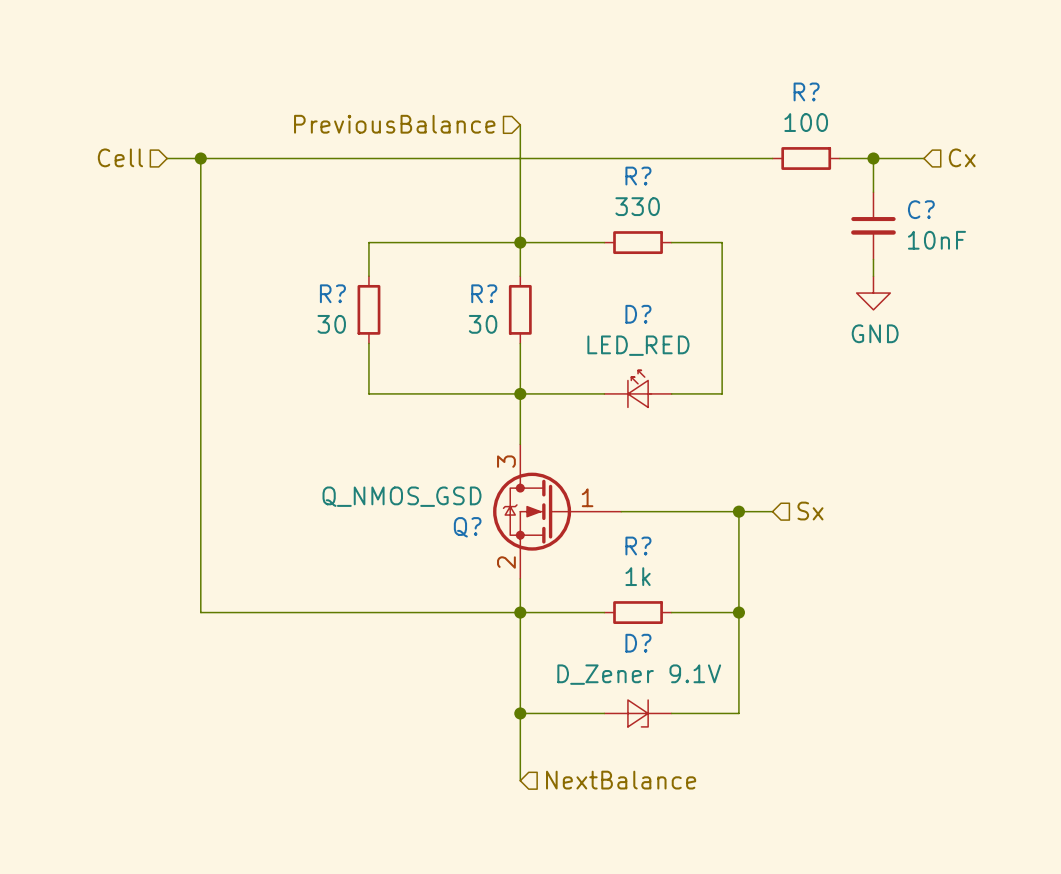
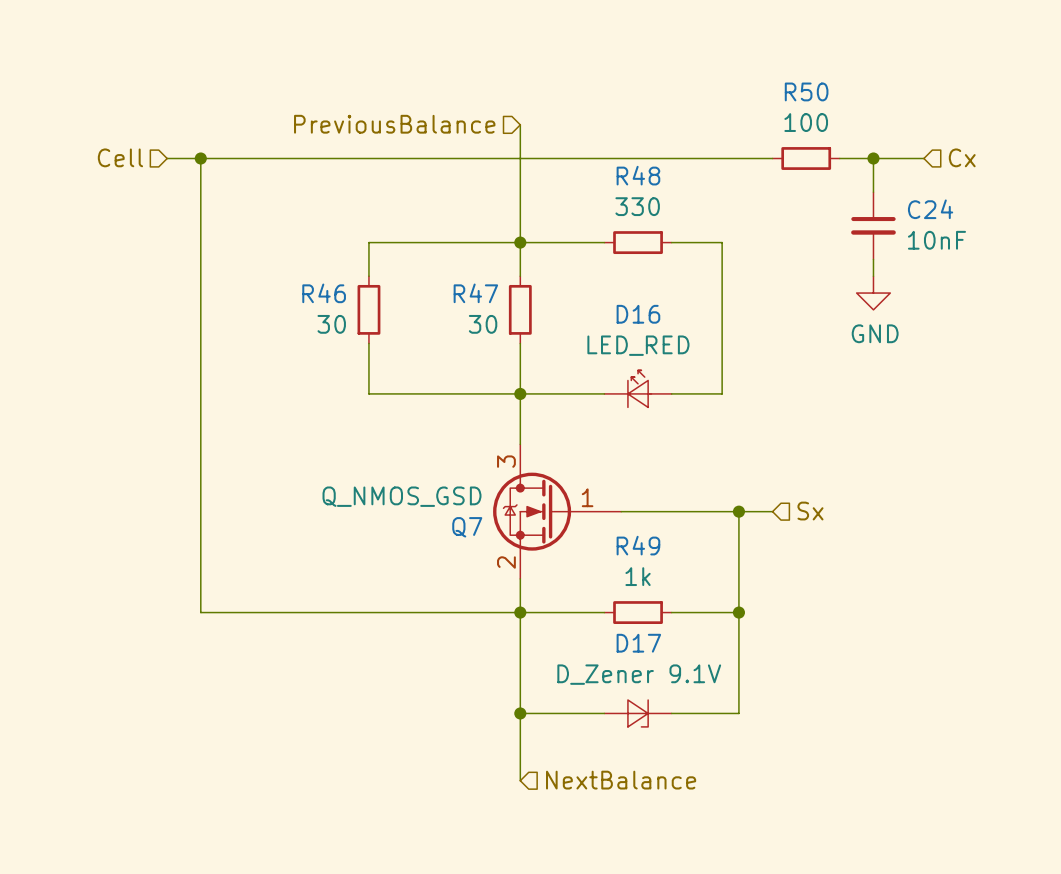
R? name: R? (806, 91) -> R50 (806, 91)
R? name: R? (638, 176) -> R48 (638, 175)
C? name: C? (921, 209) -> C24 (930, 209)
R? name: R? (332, 293) -> R46 (324, 293)
R? name: R? (484, 293) -> R47 (475, 293)
D? name: D? (638, 314) -> D16 (638, 314)
Q? name: Q? (467, 527) -> Q7 (467, 527)
R? name: R? (638, 546) -> R49 (638, 545)
D? name: D? (638, 643) -> D17 (638, 643)

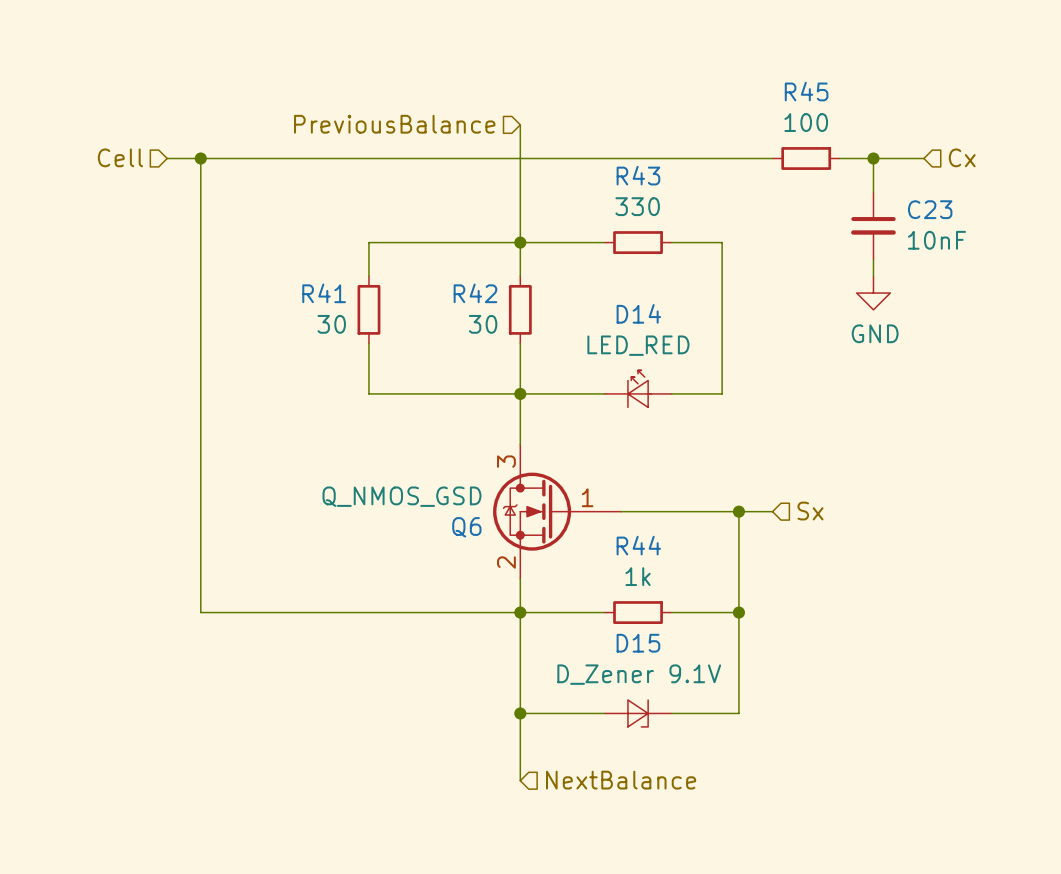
R50 name: R50 (806, 91) -> R45 (806, 91)
R48 name: R48 (638, 175) -> R43 (638, 175)
C24 name: C24 (930, 209) -> C23 (930, 209)
R46 name: R46 (324, 293) -> R41 (324, 293)
R47 name: R47 (475, 293) -> R42 (475, 293)
D16 name: D16 (638, 314) -> D14 (638, 313)
Q7 name: Q7 (467, 527) -> Q6 (466, 527)
R49 name: R49 (638, 545) -> R44 (638, 545)
D17 name: D17 (638, 643) -> D15 (638, 643)

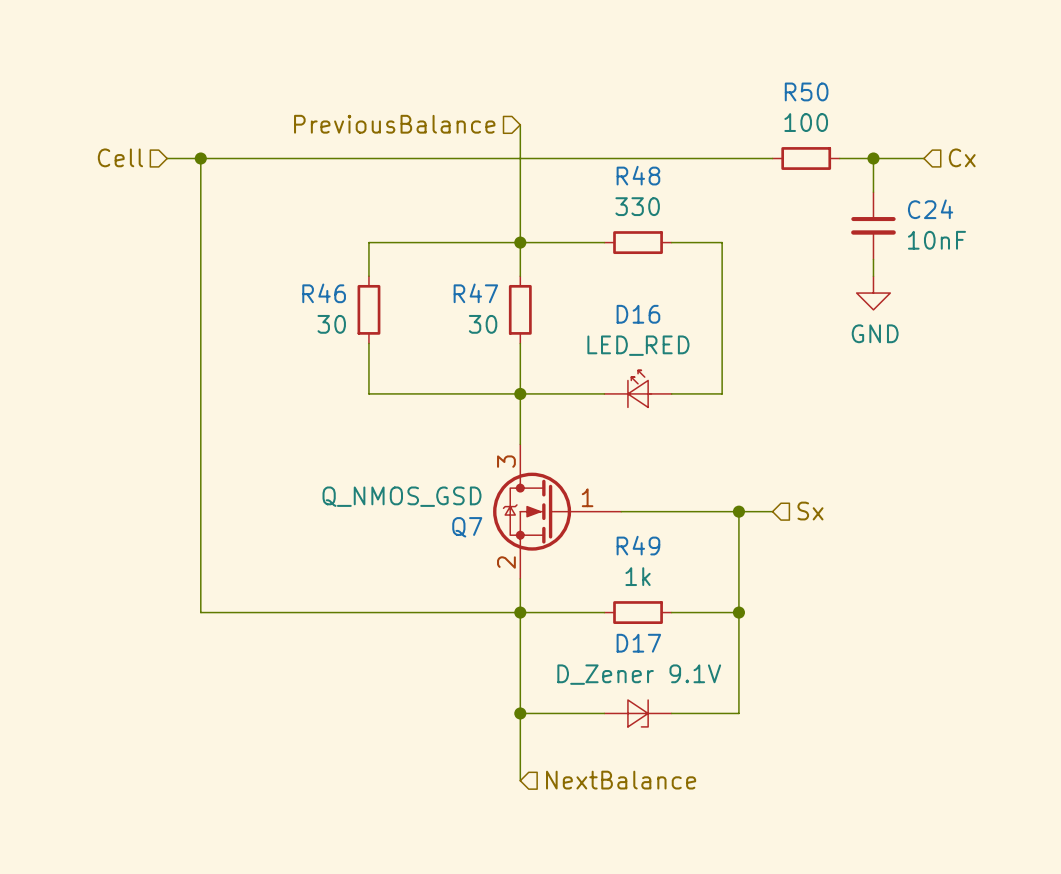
R45 name: R45 (806, 91) -> R50 (806, 91)
R43 name: R43 (638, 175) -> R48 (638, 175)
C23 name: C23 (930, 209) -> C24 (930, 209)
R41 name: R41 (324, 293) -> R46 (324, 293)
R42 name: R42 (475, 293) -> R47 (475, 293)
D14 name: D14 (638, 313) -> D16 (638, 314)
Q6 name: Q6 (466, 527) -> Q7 (467, 527)
R44 name: R44 (638, 545) -> R49 (638, 545)
D15 name: D15 (638, 643) -> D17 (638, 643)

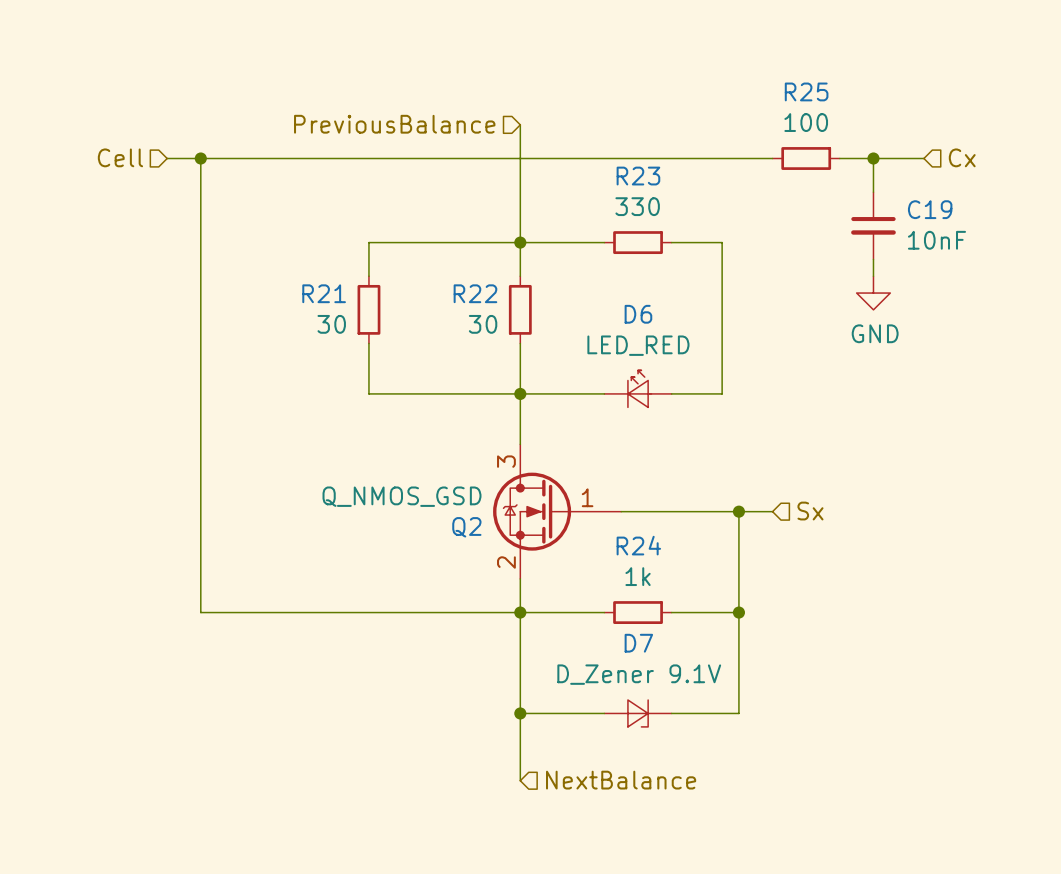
R50 name: R50 (806, 91) -> R25 (806, 91)
R48 name: R48 (638, 175) -> R23 (638, 176)
C24 name: C24 (930, 209) -> C19 (930, 209)
R46 name: R46 (324, 293) -> R21 (324, 293)
R47 name: R47 (475, 293) -> R22 (475, 293)
D16 name: D16 (638, 314) -> D6 (638, 314)
Q7 name: Q7 (467, 527) -> Q2 (466, 527)
R49 name: R49 (638, 545) -> R24 (638, 545)
D17 name: D17 (638, 643) -> D7 (638, 643)

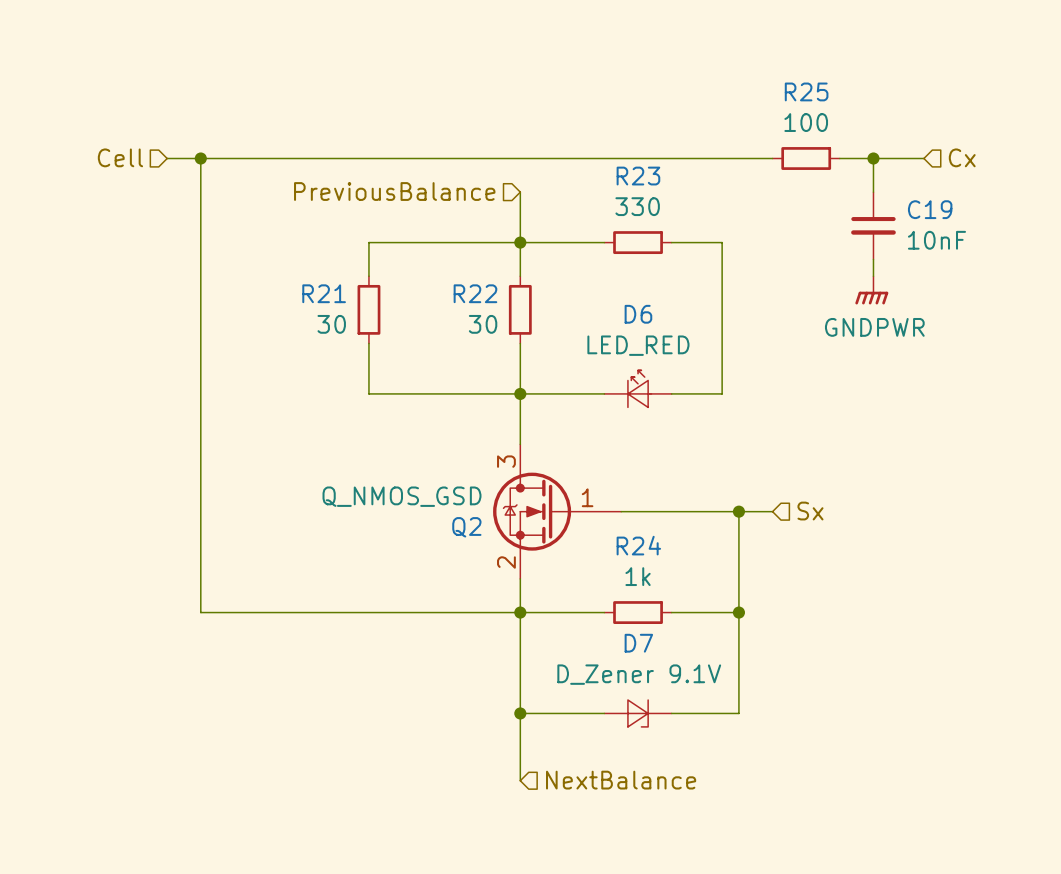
hierarchical label position: PreviousBalance (394, 124) -> PreviousBalance (394, 191)
wire: (520, 124) (520, 192) -> none
power symbol: GND (873, 293) -> GNDPWR (871, 290)

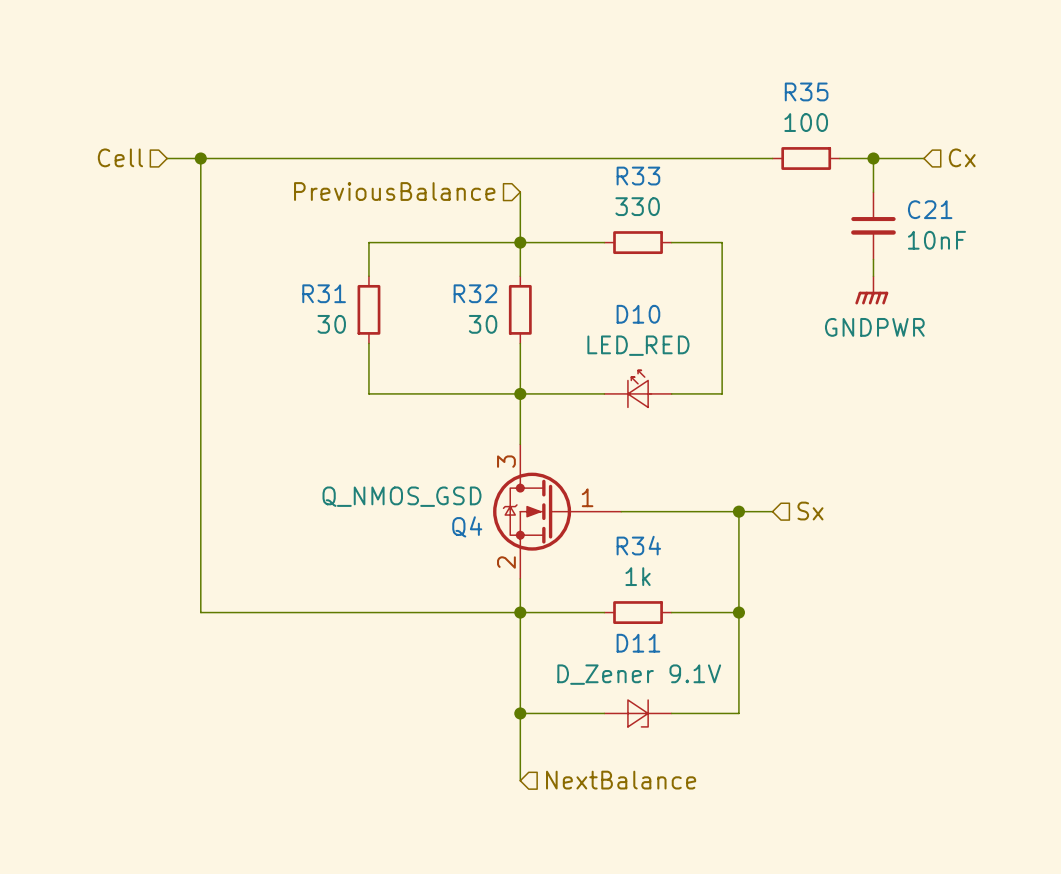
R25 name: R25 (806, 91) -> R35 (806, 91)
R23 name: R23 (638, 176) -> R33 (638, 176)
C19 name: C19 (930, 209) -> C21 (930, 209)
R21 name: R21 (324, 293) -> R31 (324, 293)
R22 name: R22 (475, 293) -> R32 (475, 293)
D6 name: D6 (638, 314) -> D10 (638, 314)
Q2 name: Q2 (466, 527) -> Q4 (467, 526)
R24 name: R24 (638, 545) -> R34 (638, 545)
D7 name: D7 (638, 643) -> D11 (638, 643)

